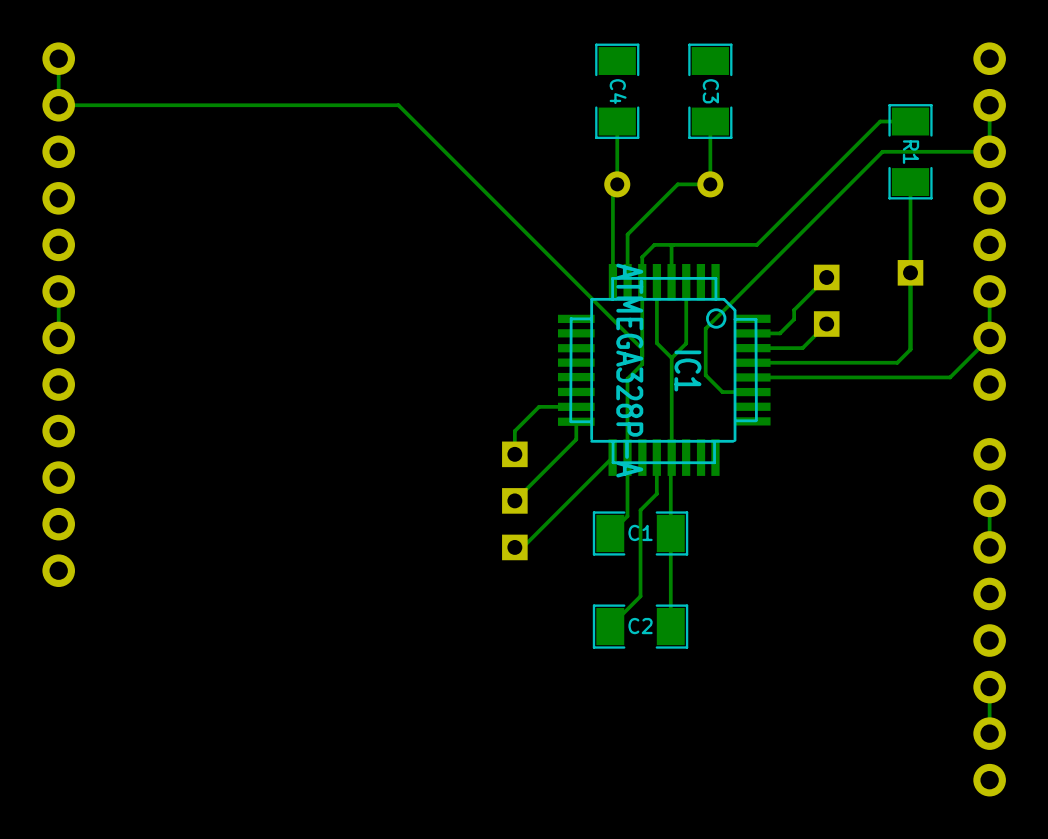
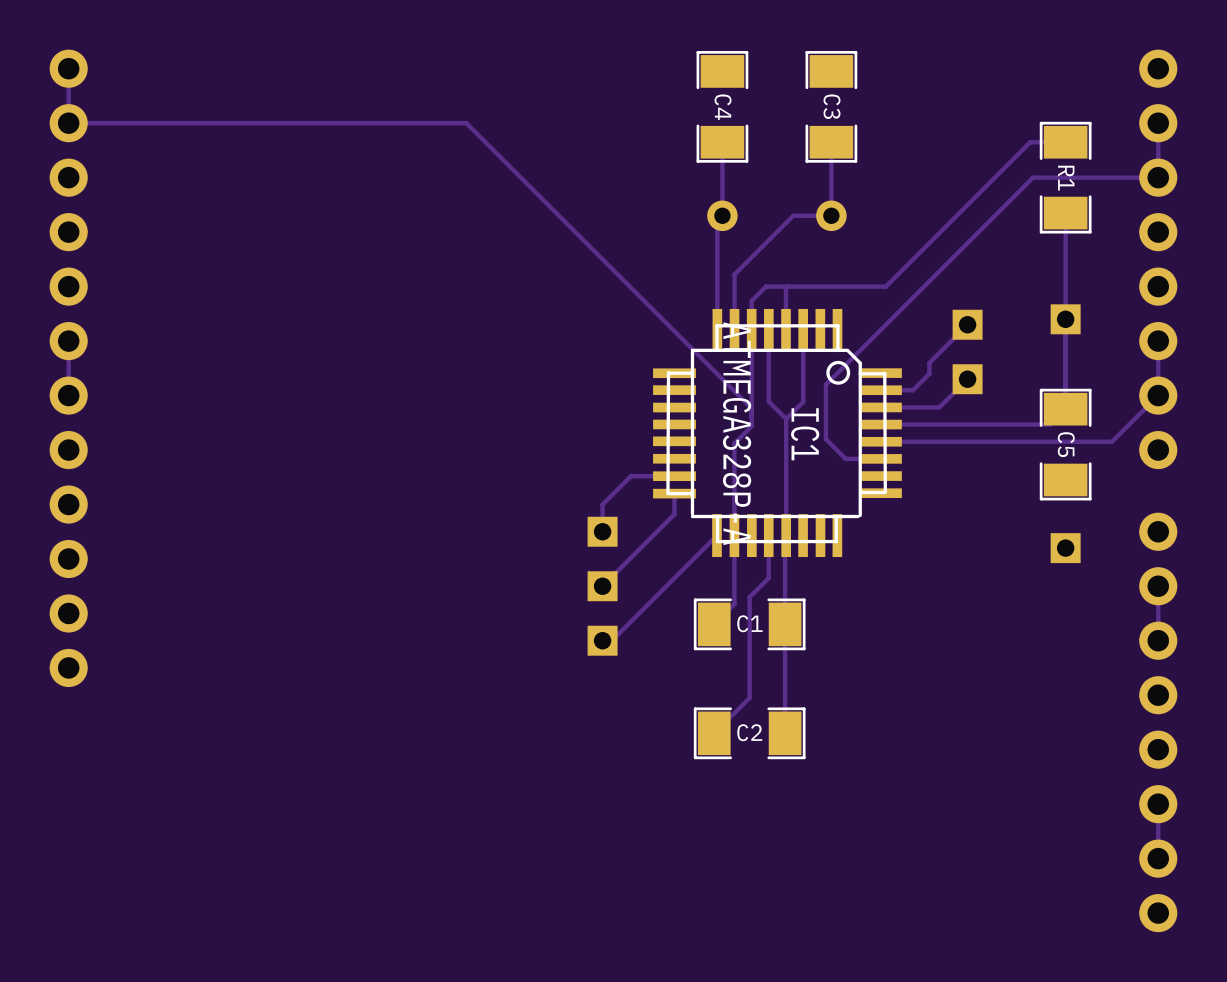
C5: none -> (1065, 444)
part: none -> (1065, 548)

